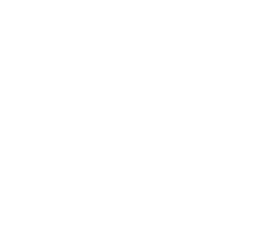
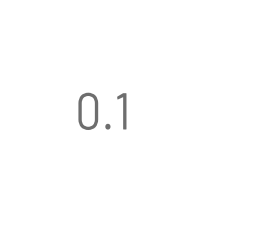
text: none -> 0.1 (102, 111)

